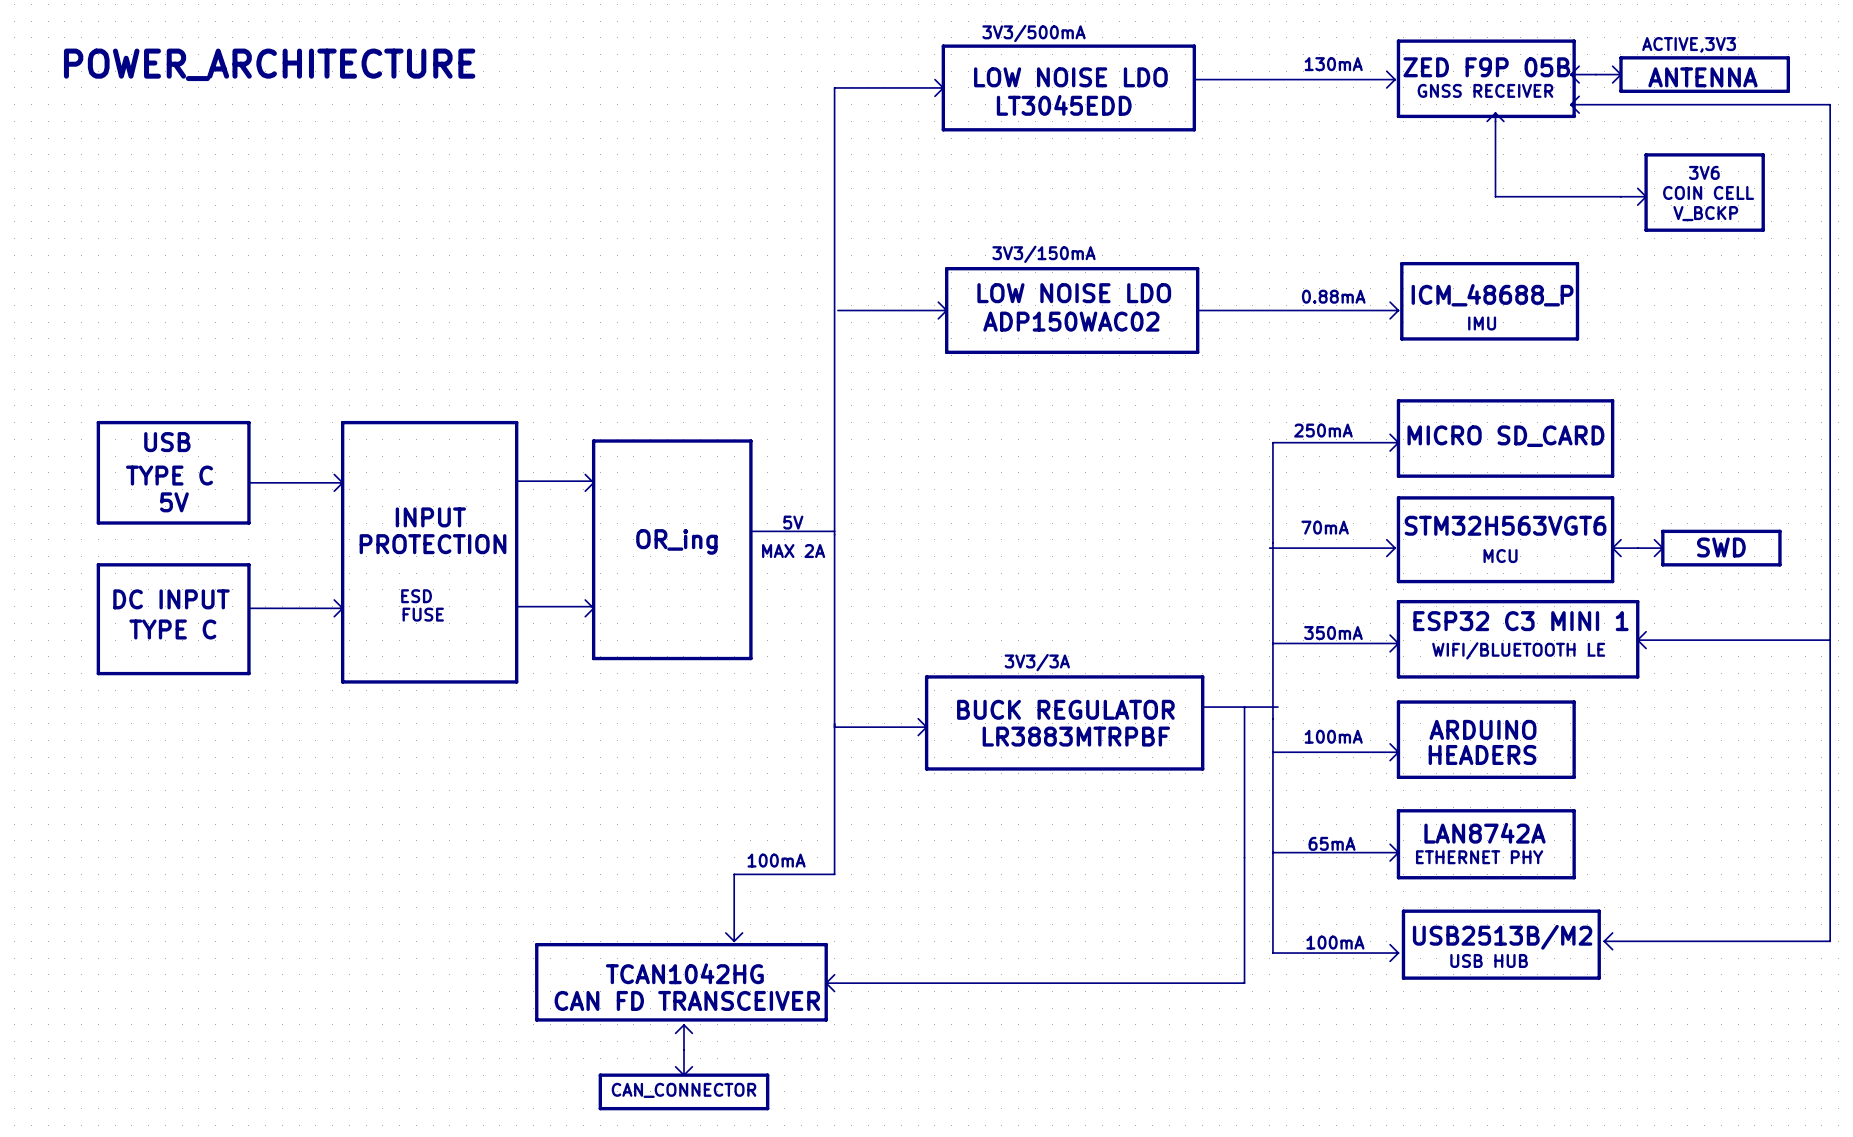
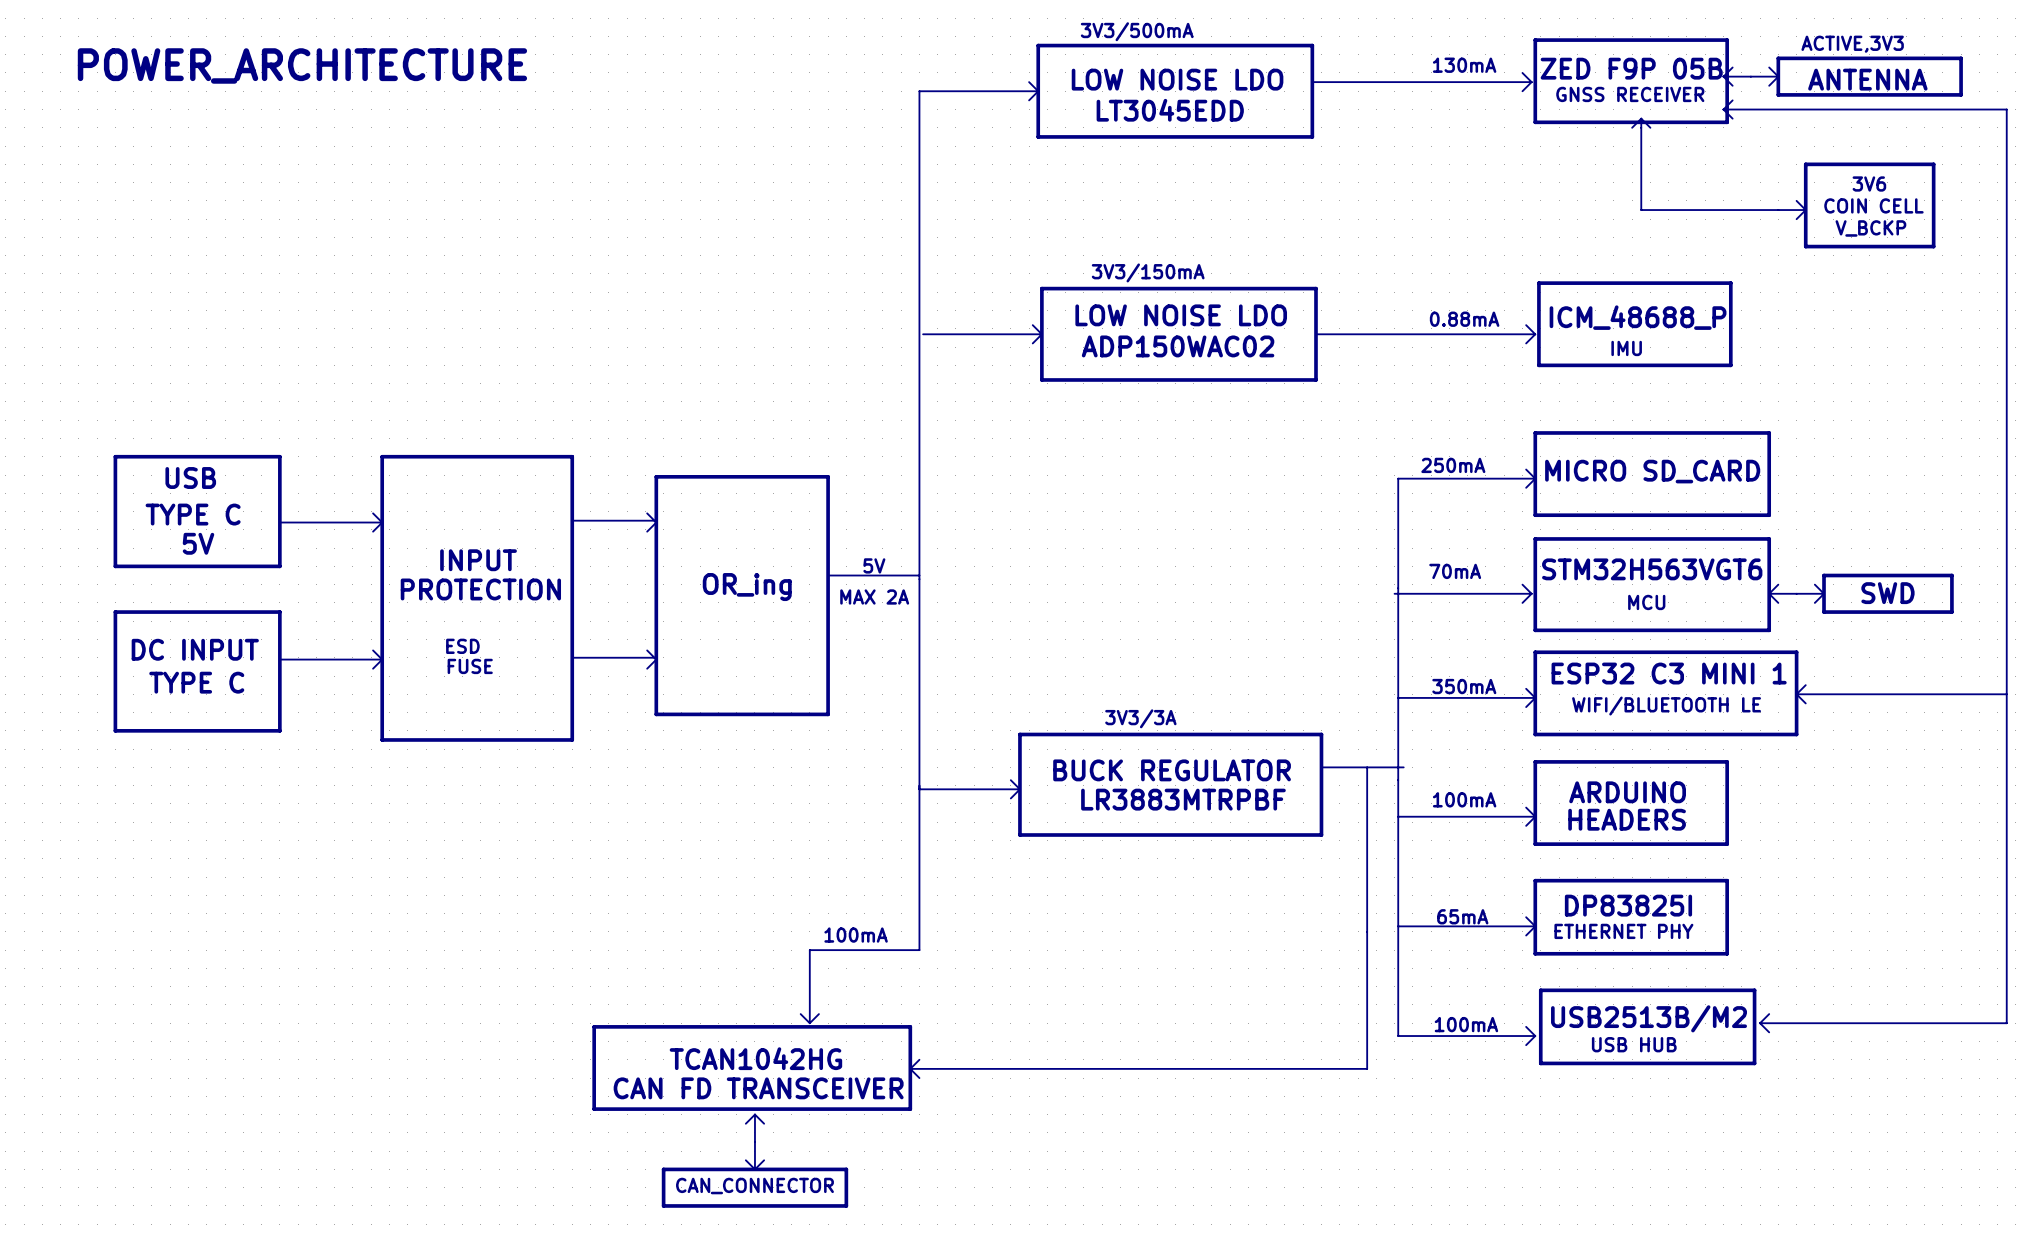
text: LAN8742A (1484, 833) -> DP83825I (1628, 905)

